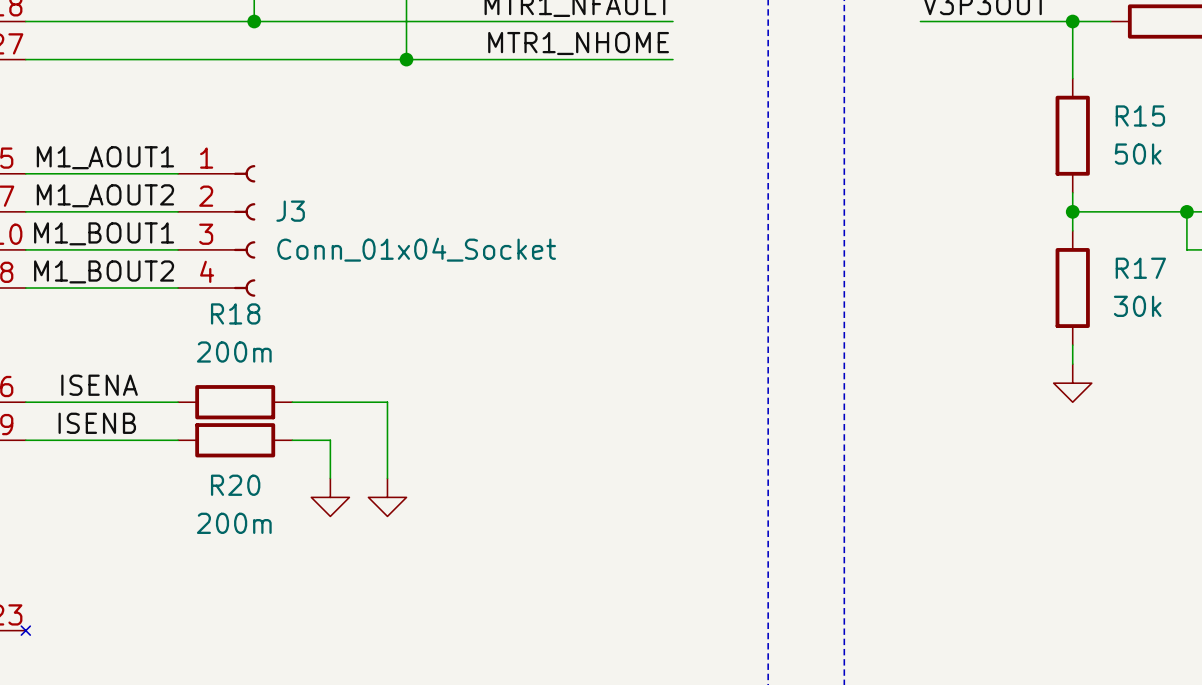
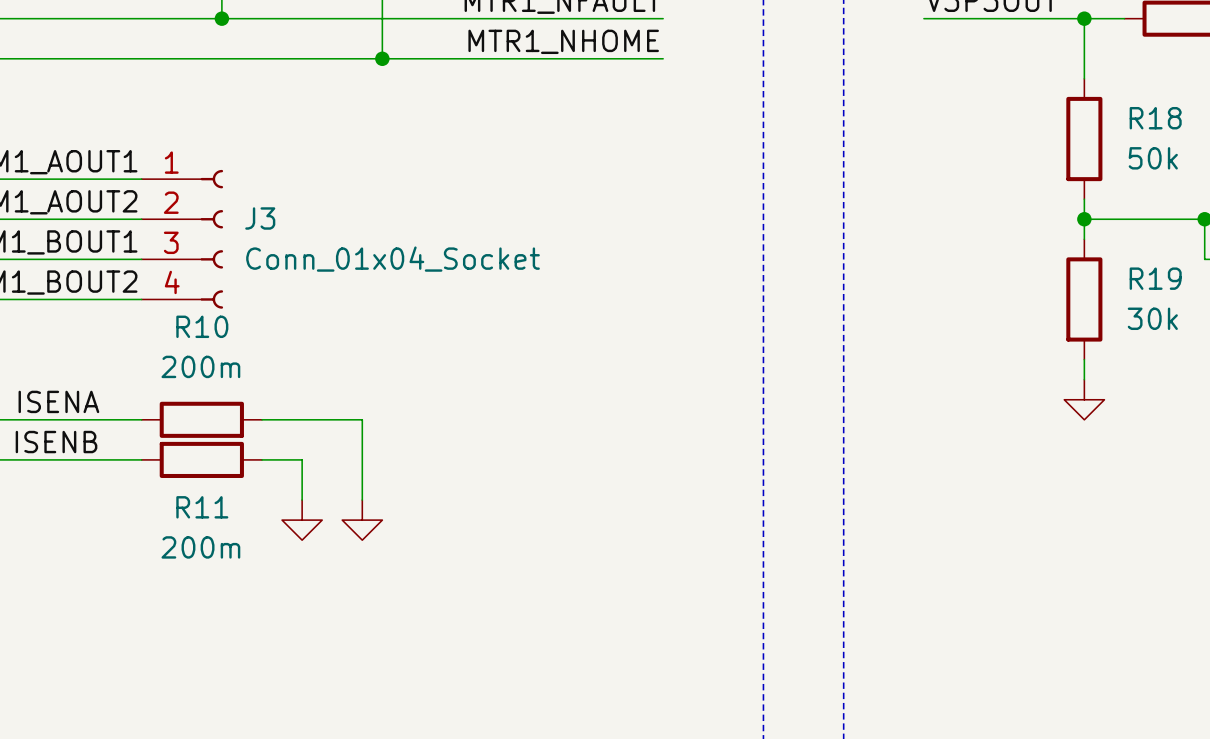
R15 name: R15 (1140, 115) -> R18 (1155, 118)
R17 name: R17 (1140, 268) -> R19 (1155, 278)
R18 name: R18 (235, 313) -> R10 (202, 326)
R20 name: R20 (235, 485) -> R11 (202, 507)

